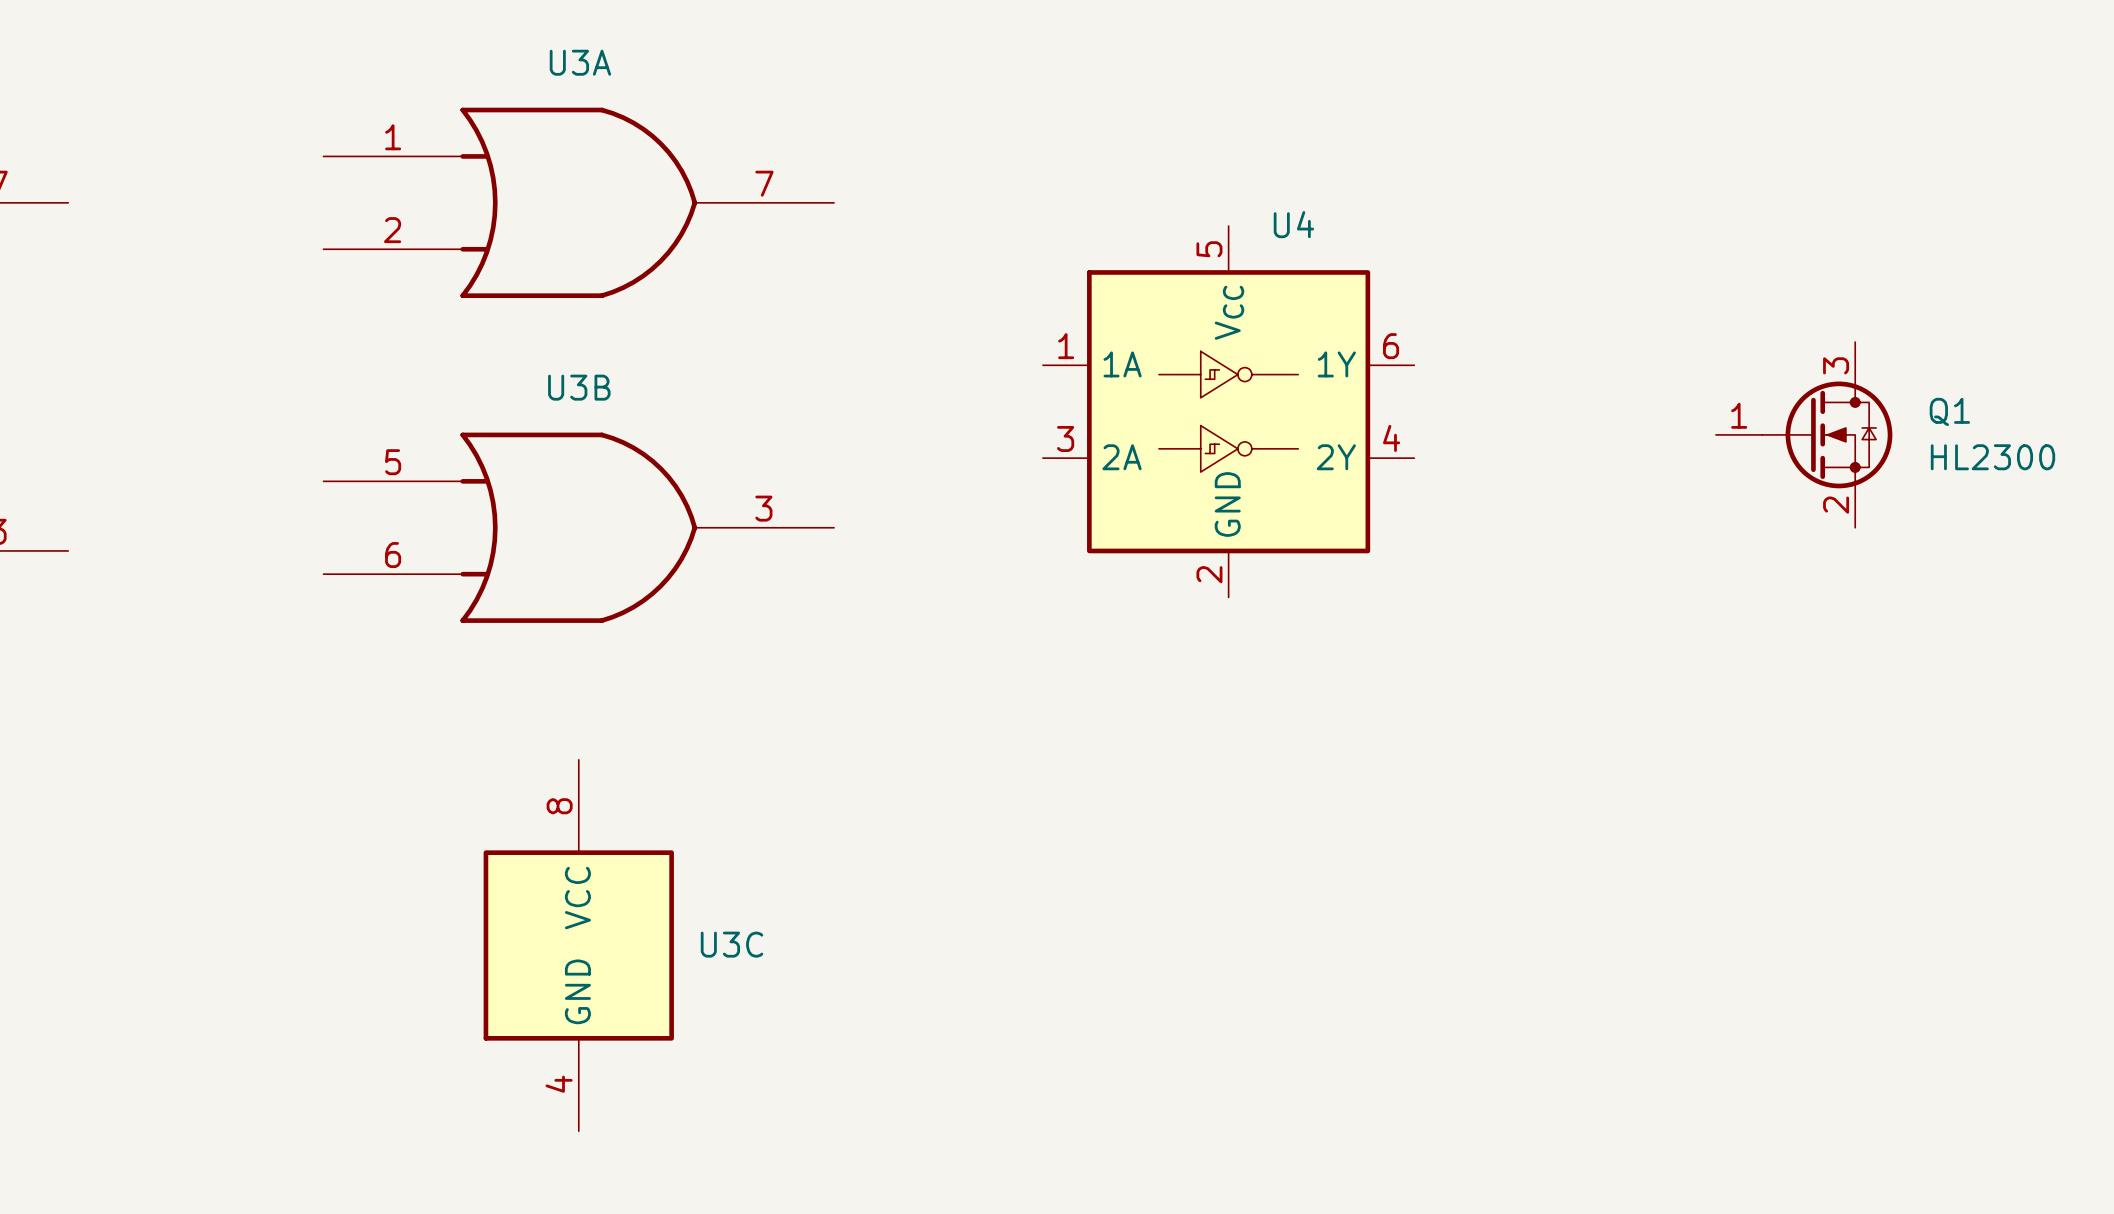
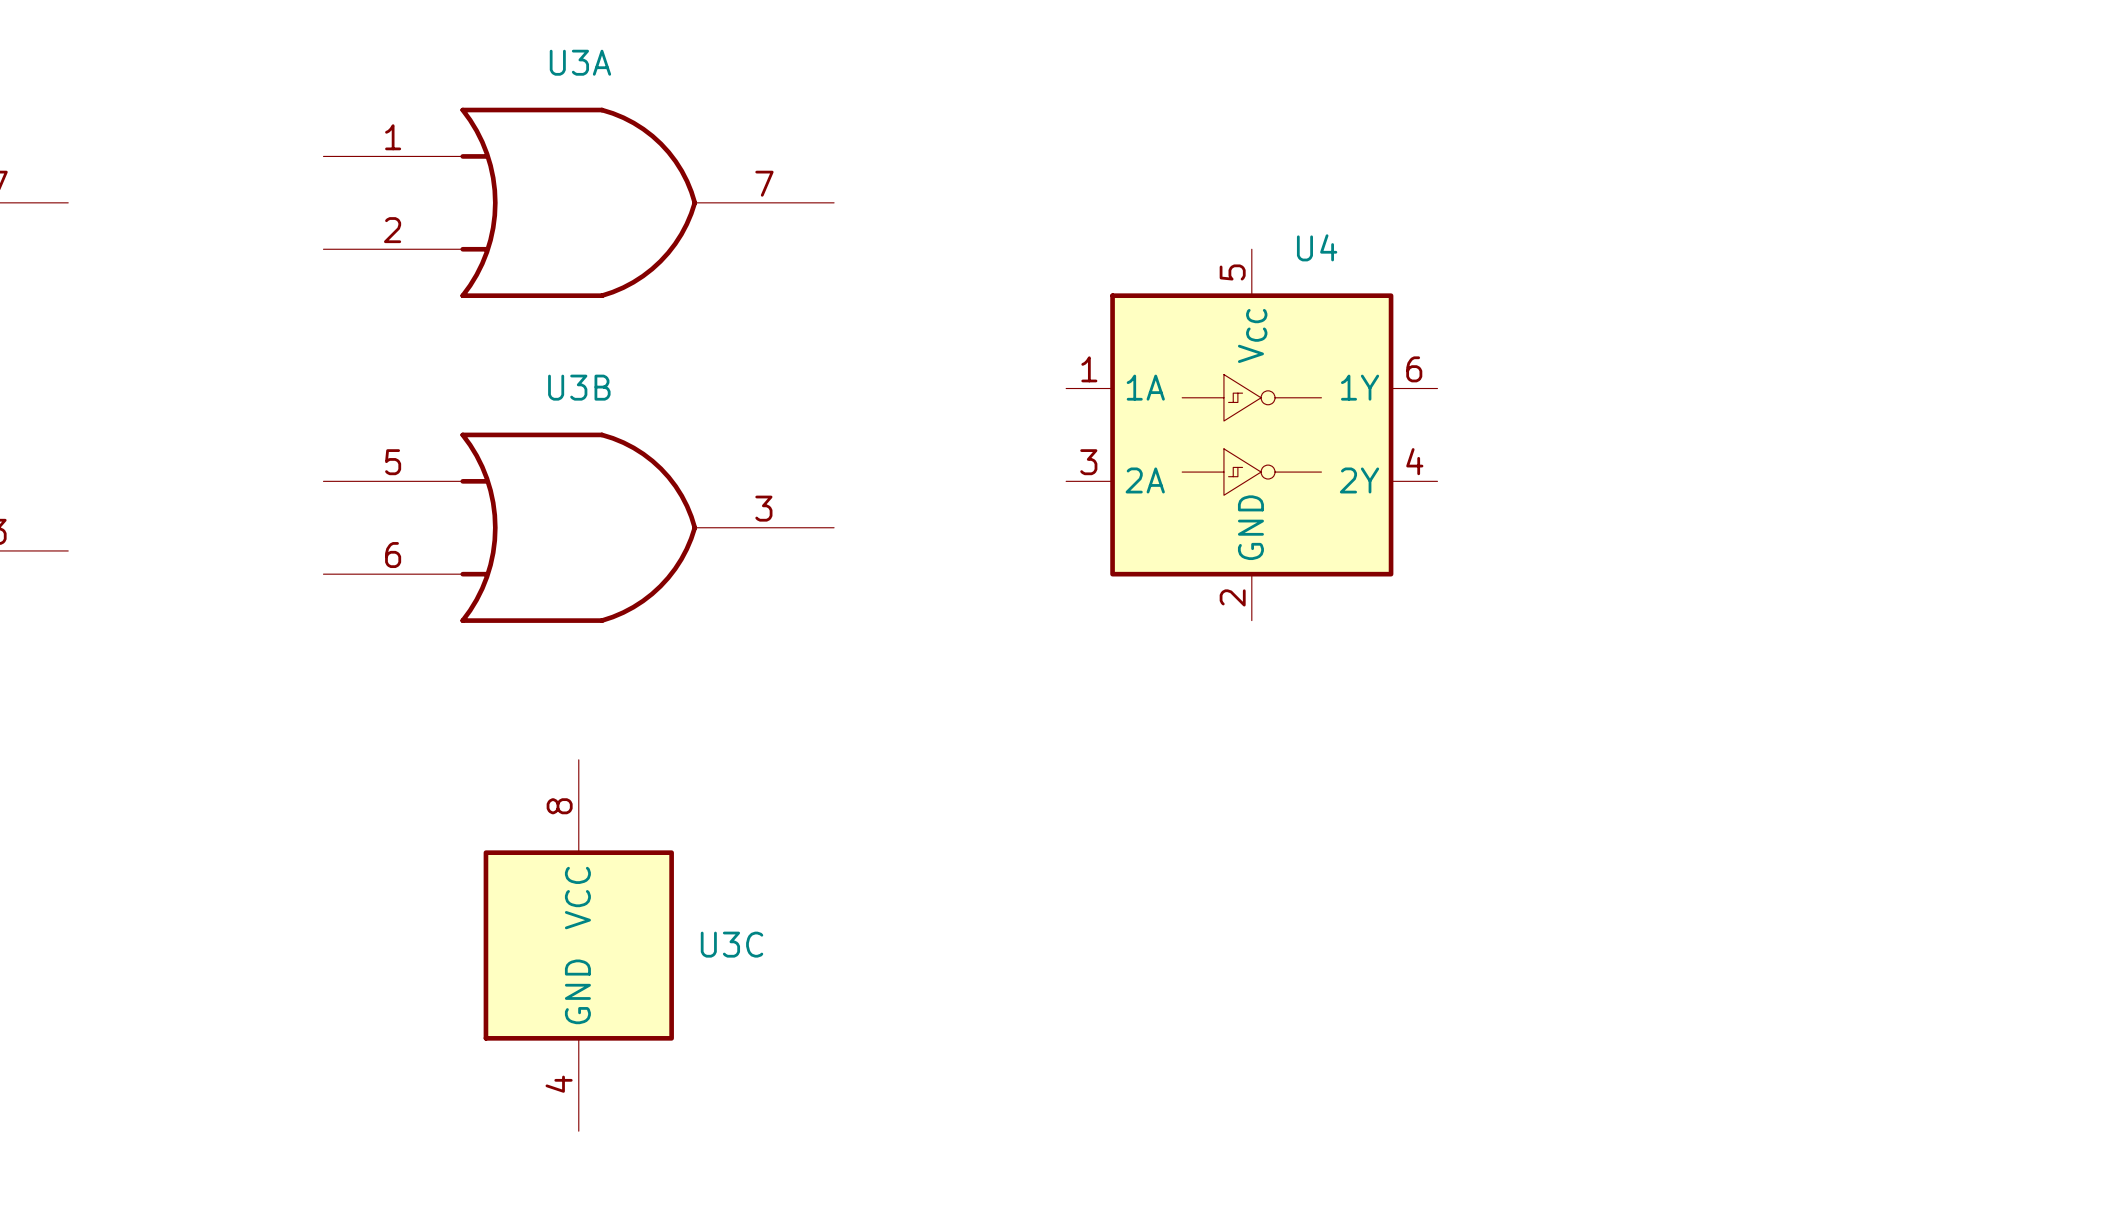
U4 position: (1228, 411) -> (1251, 434)
Q1: HL2300 (1804, 434) -> none

